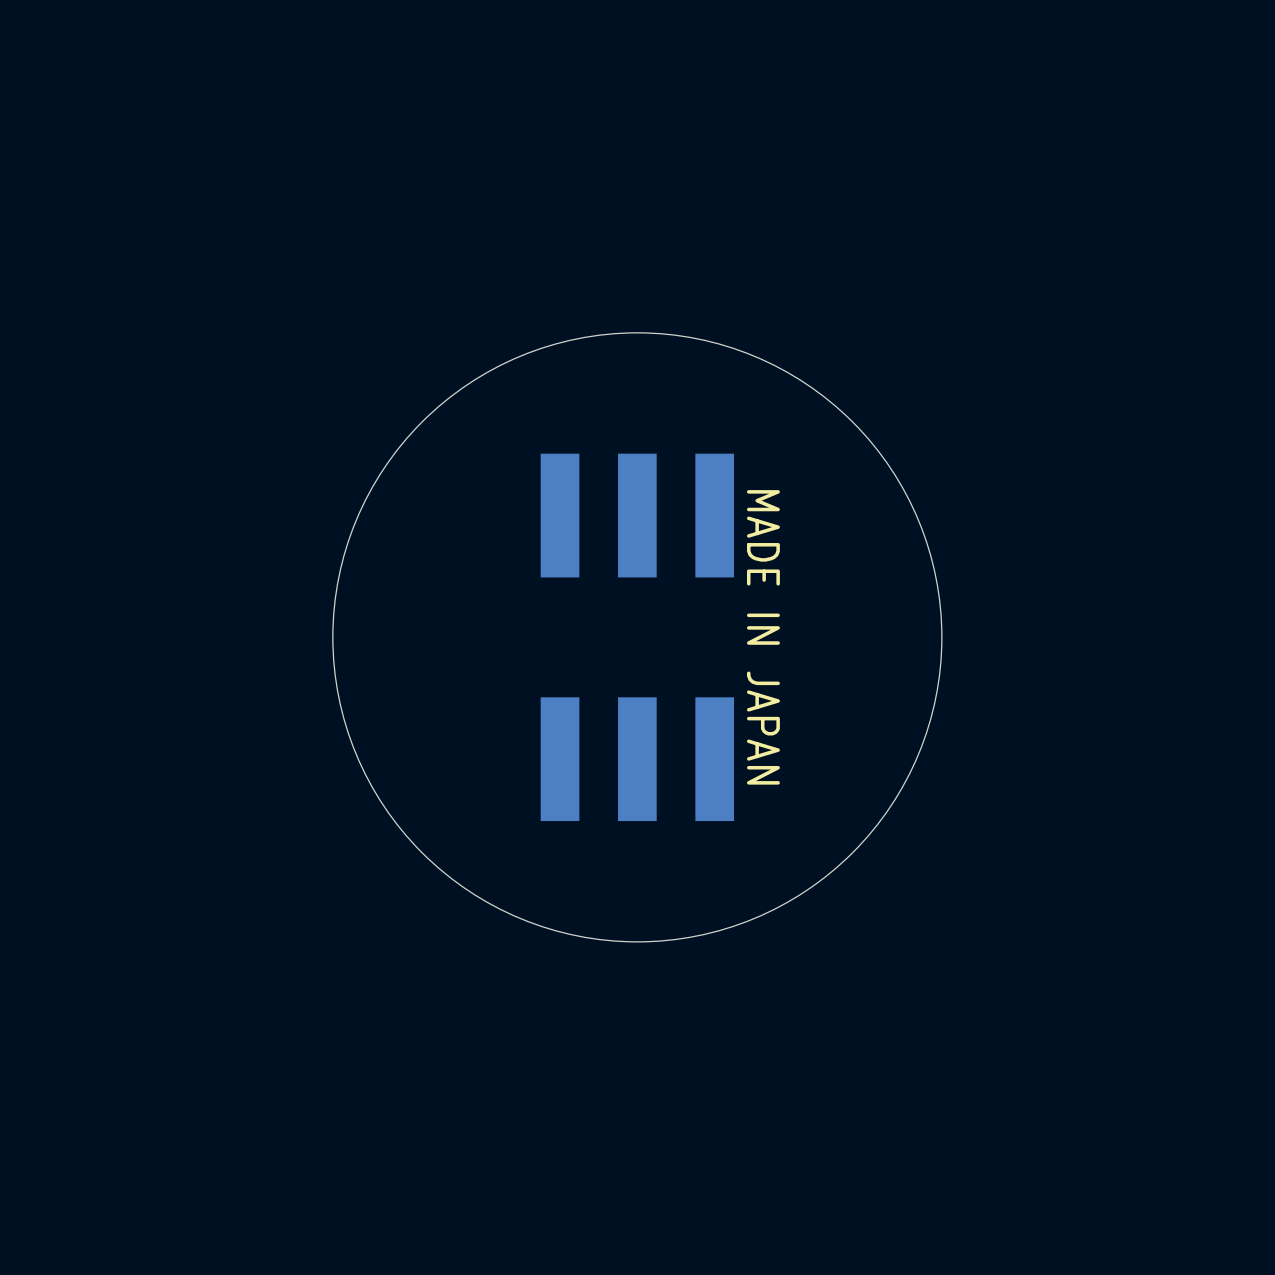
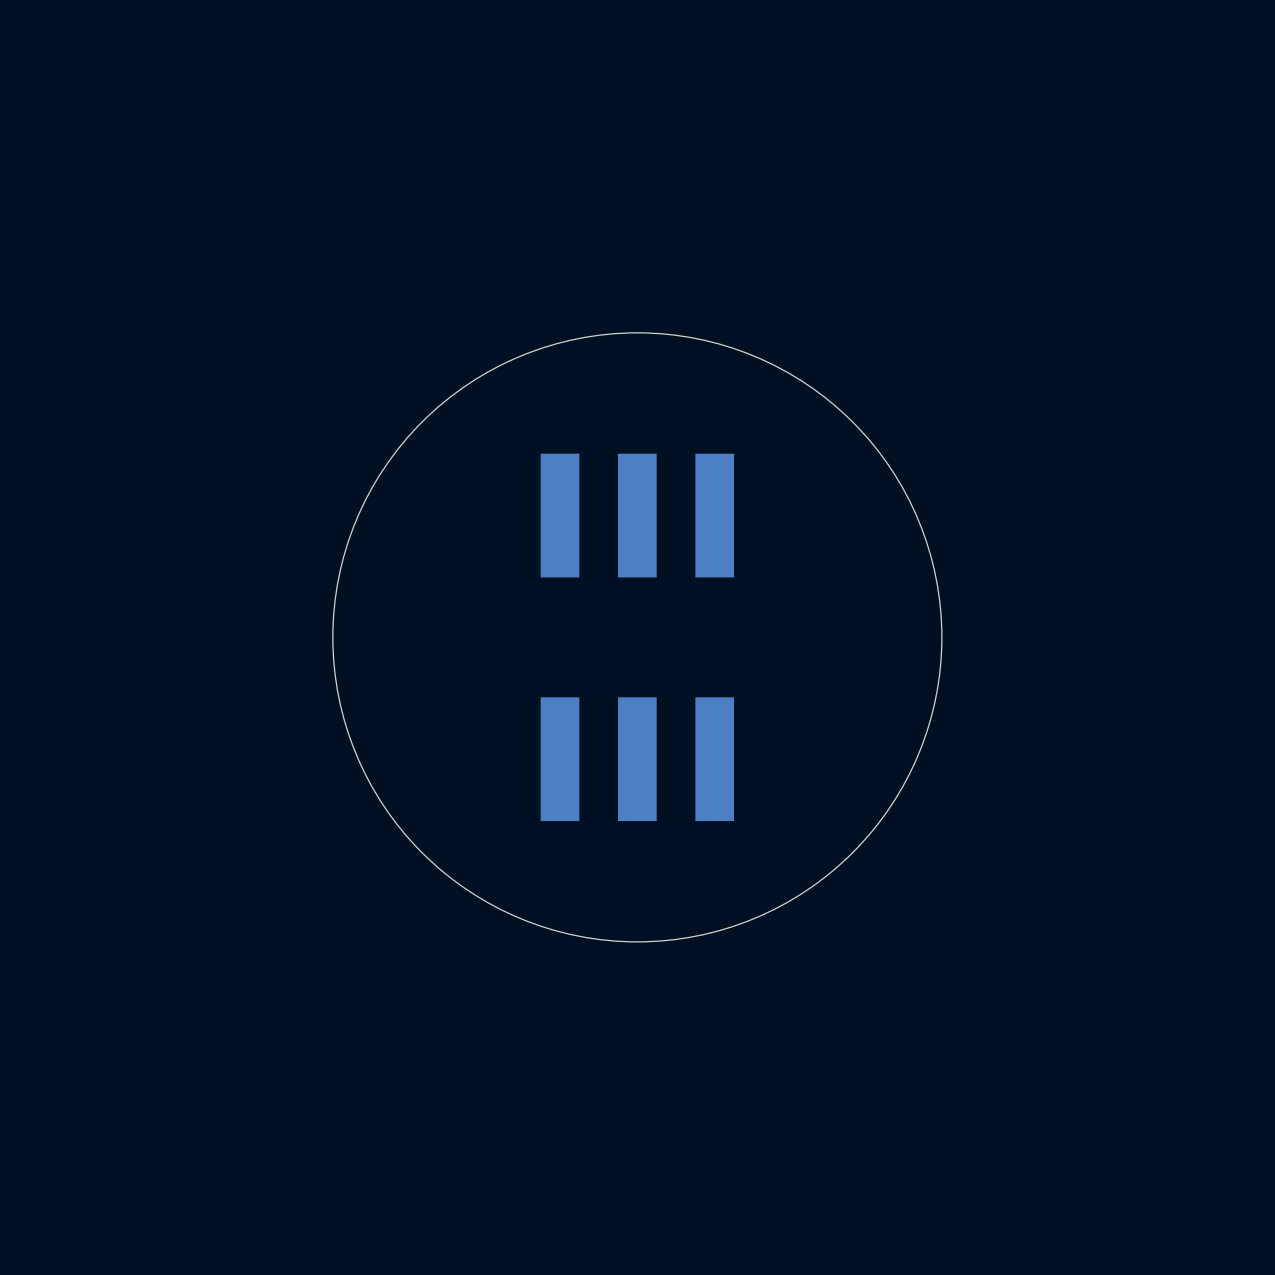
text: MADE IN JAPAN (763, 637) -> none

